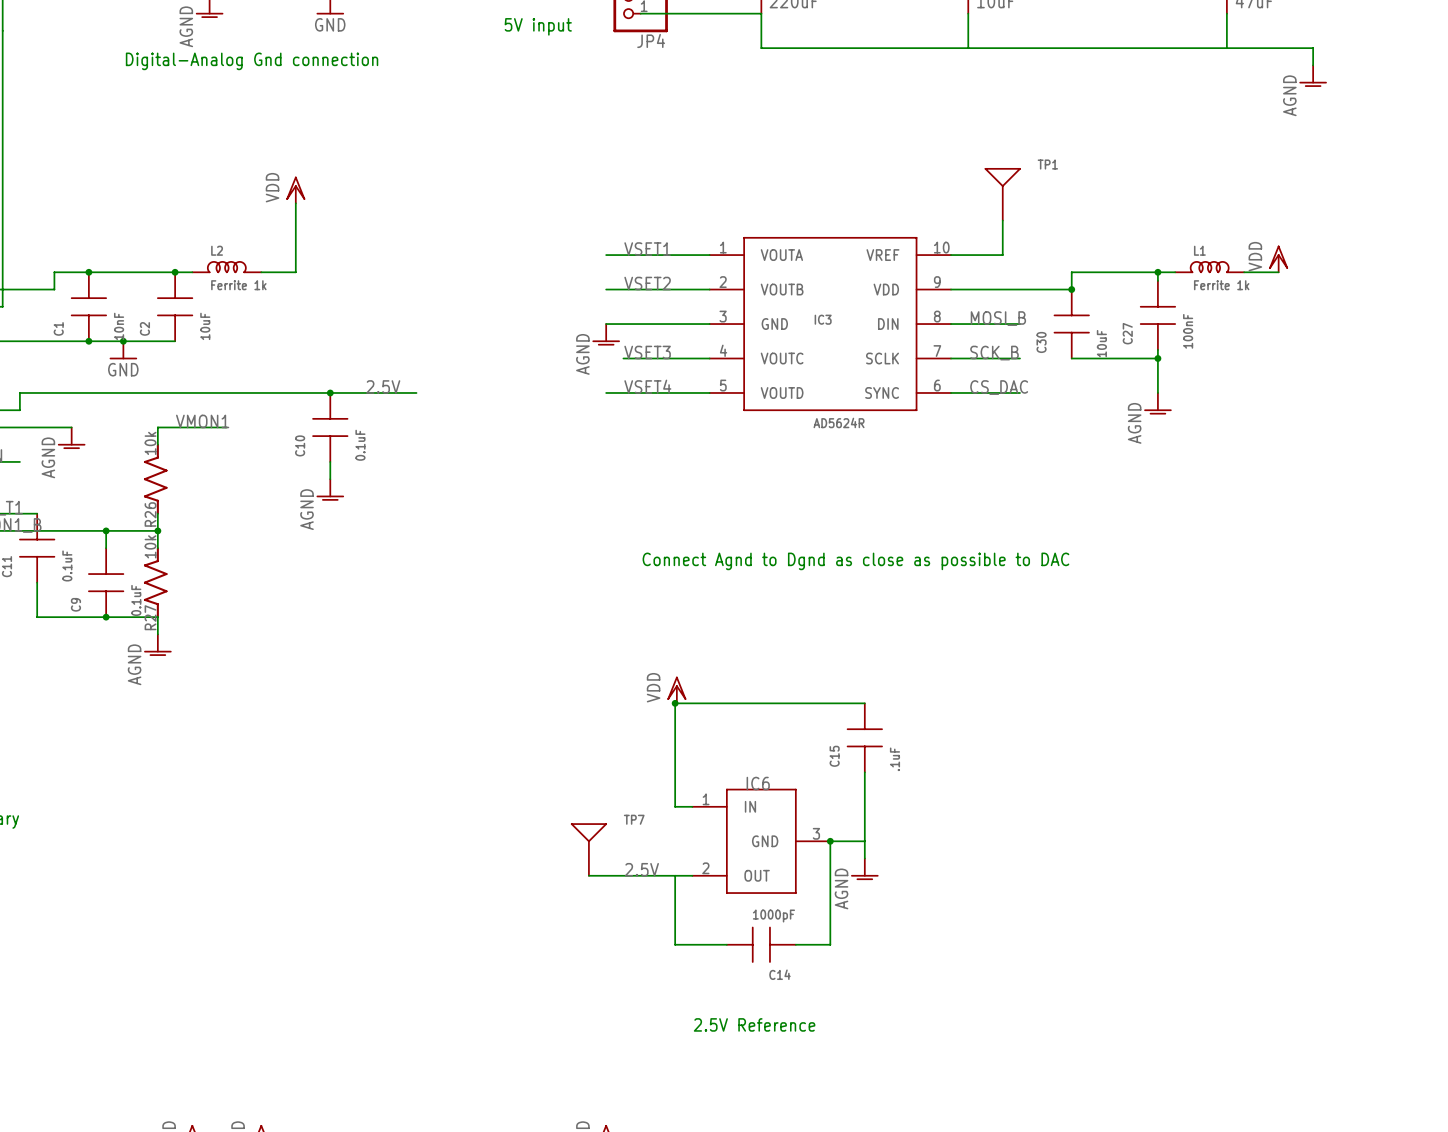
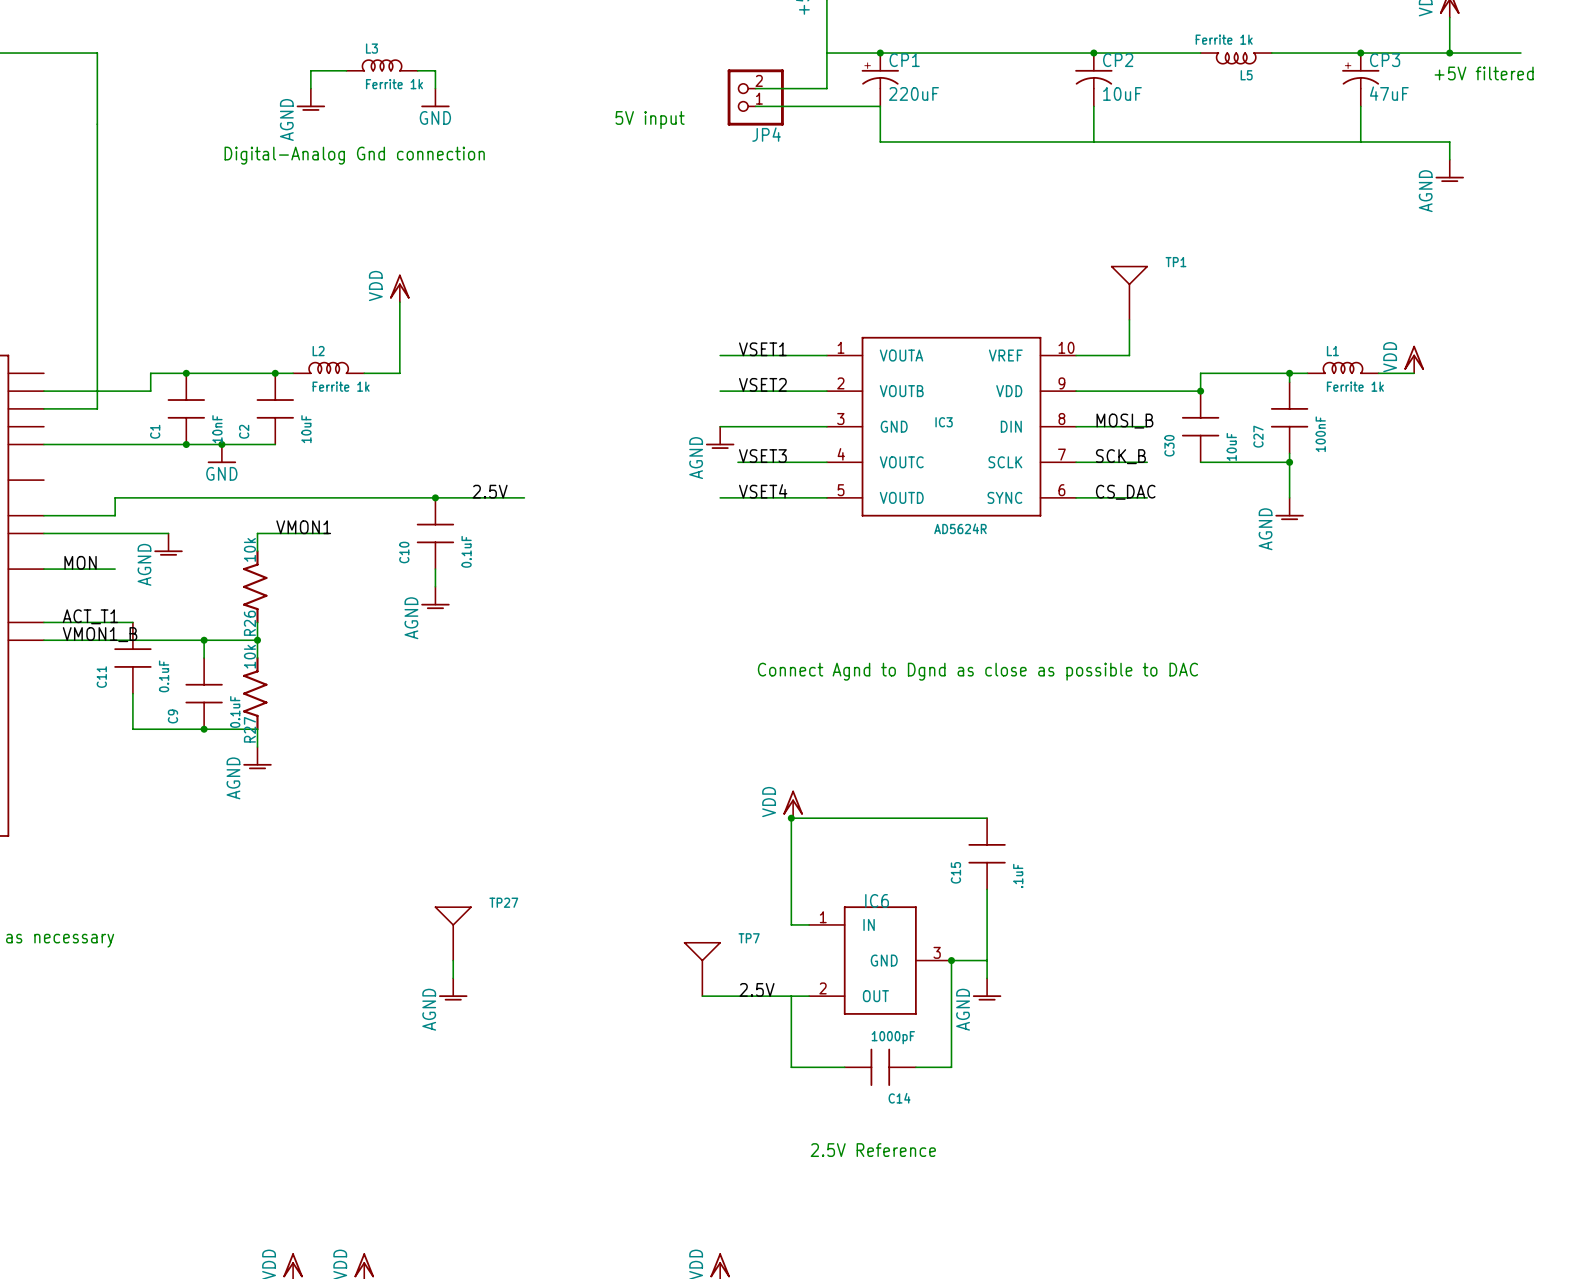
TP27: none -> (453, 933)
wire: none -> (453, 960) (453, 978)
power symbol: none -> AGND (453, 989)

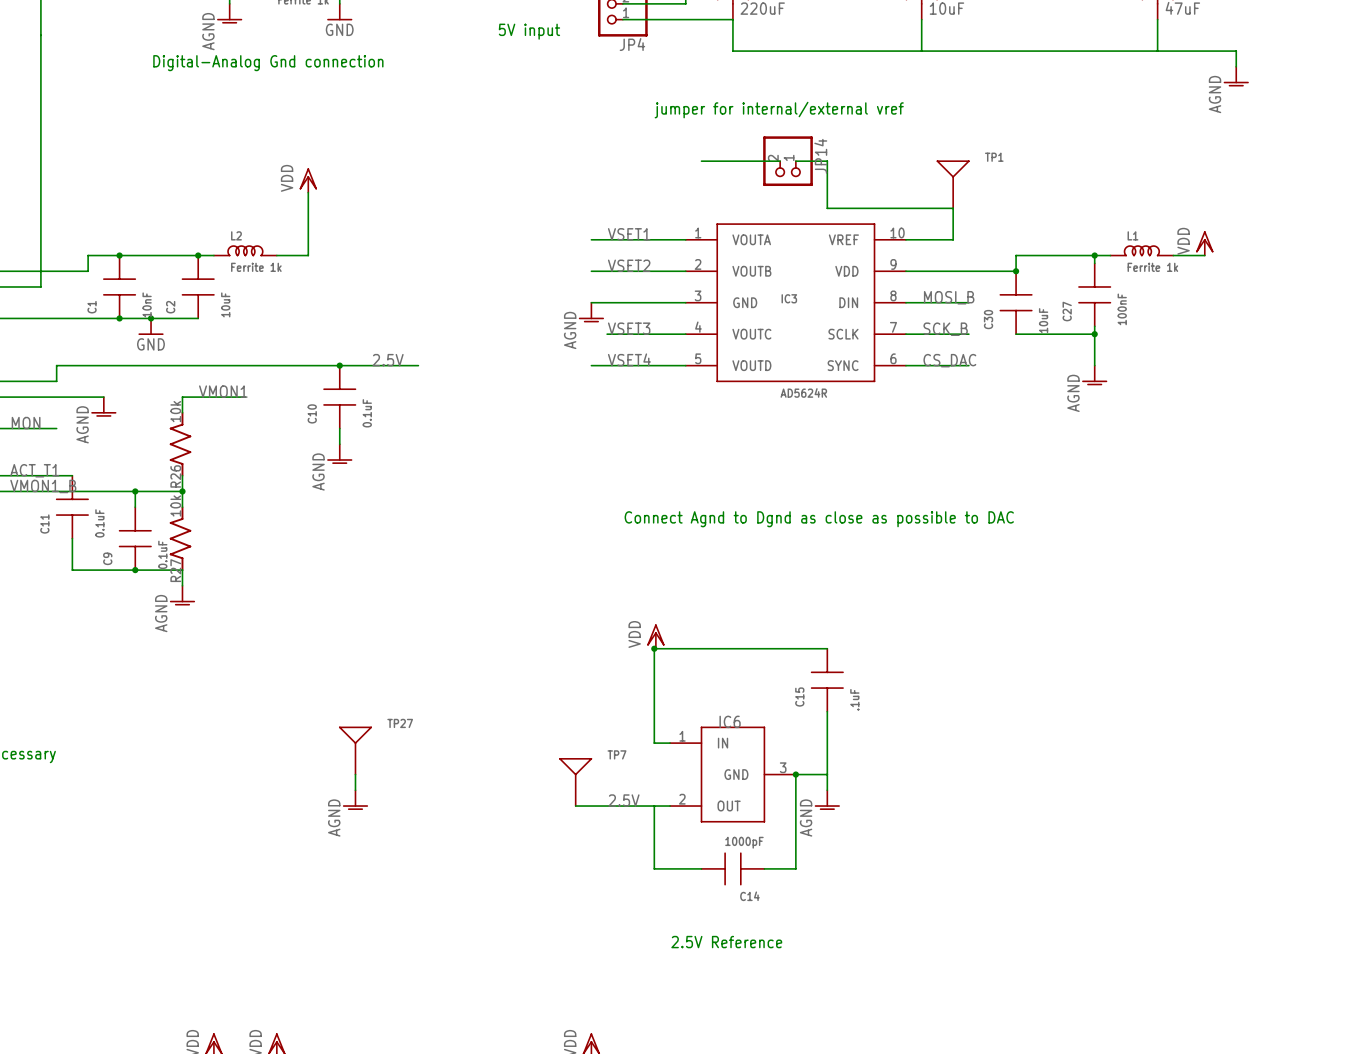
text: none -> jumper for internal/external vref (779, 110)
wire: none -> (701, 161) (780, 161)
JP14: none -> (788, 161)
wire: none -> (795, 161) (827, 161) (827, 208) (953, 208)

